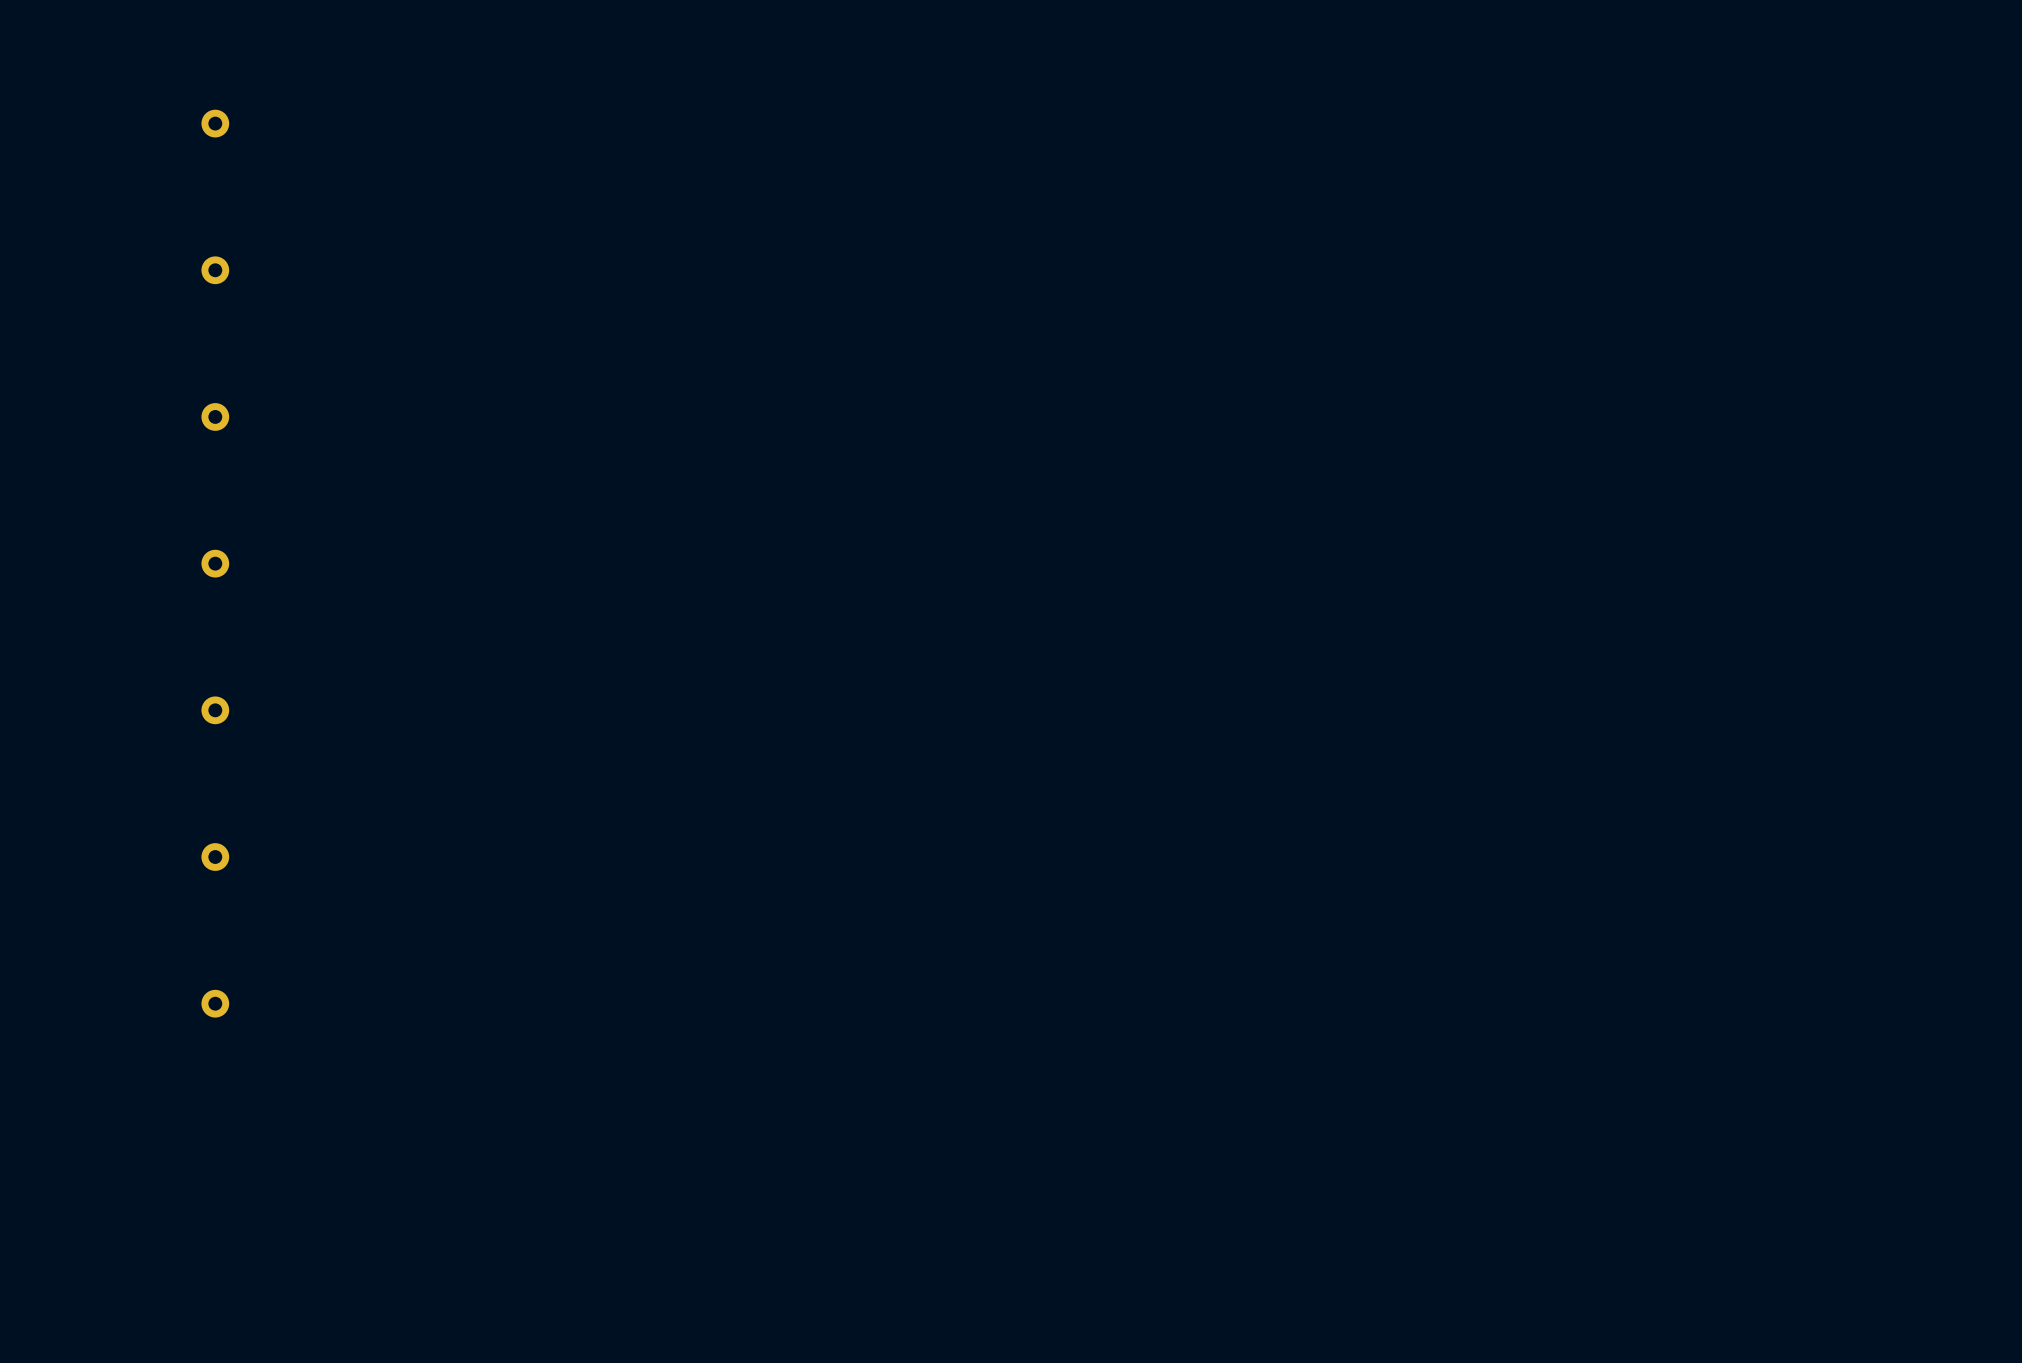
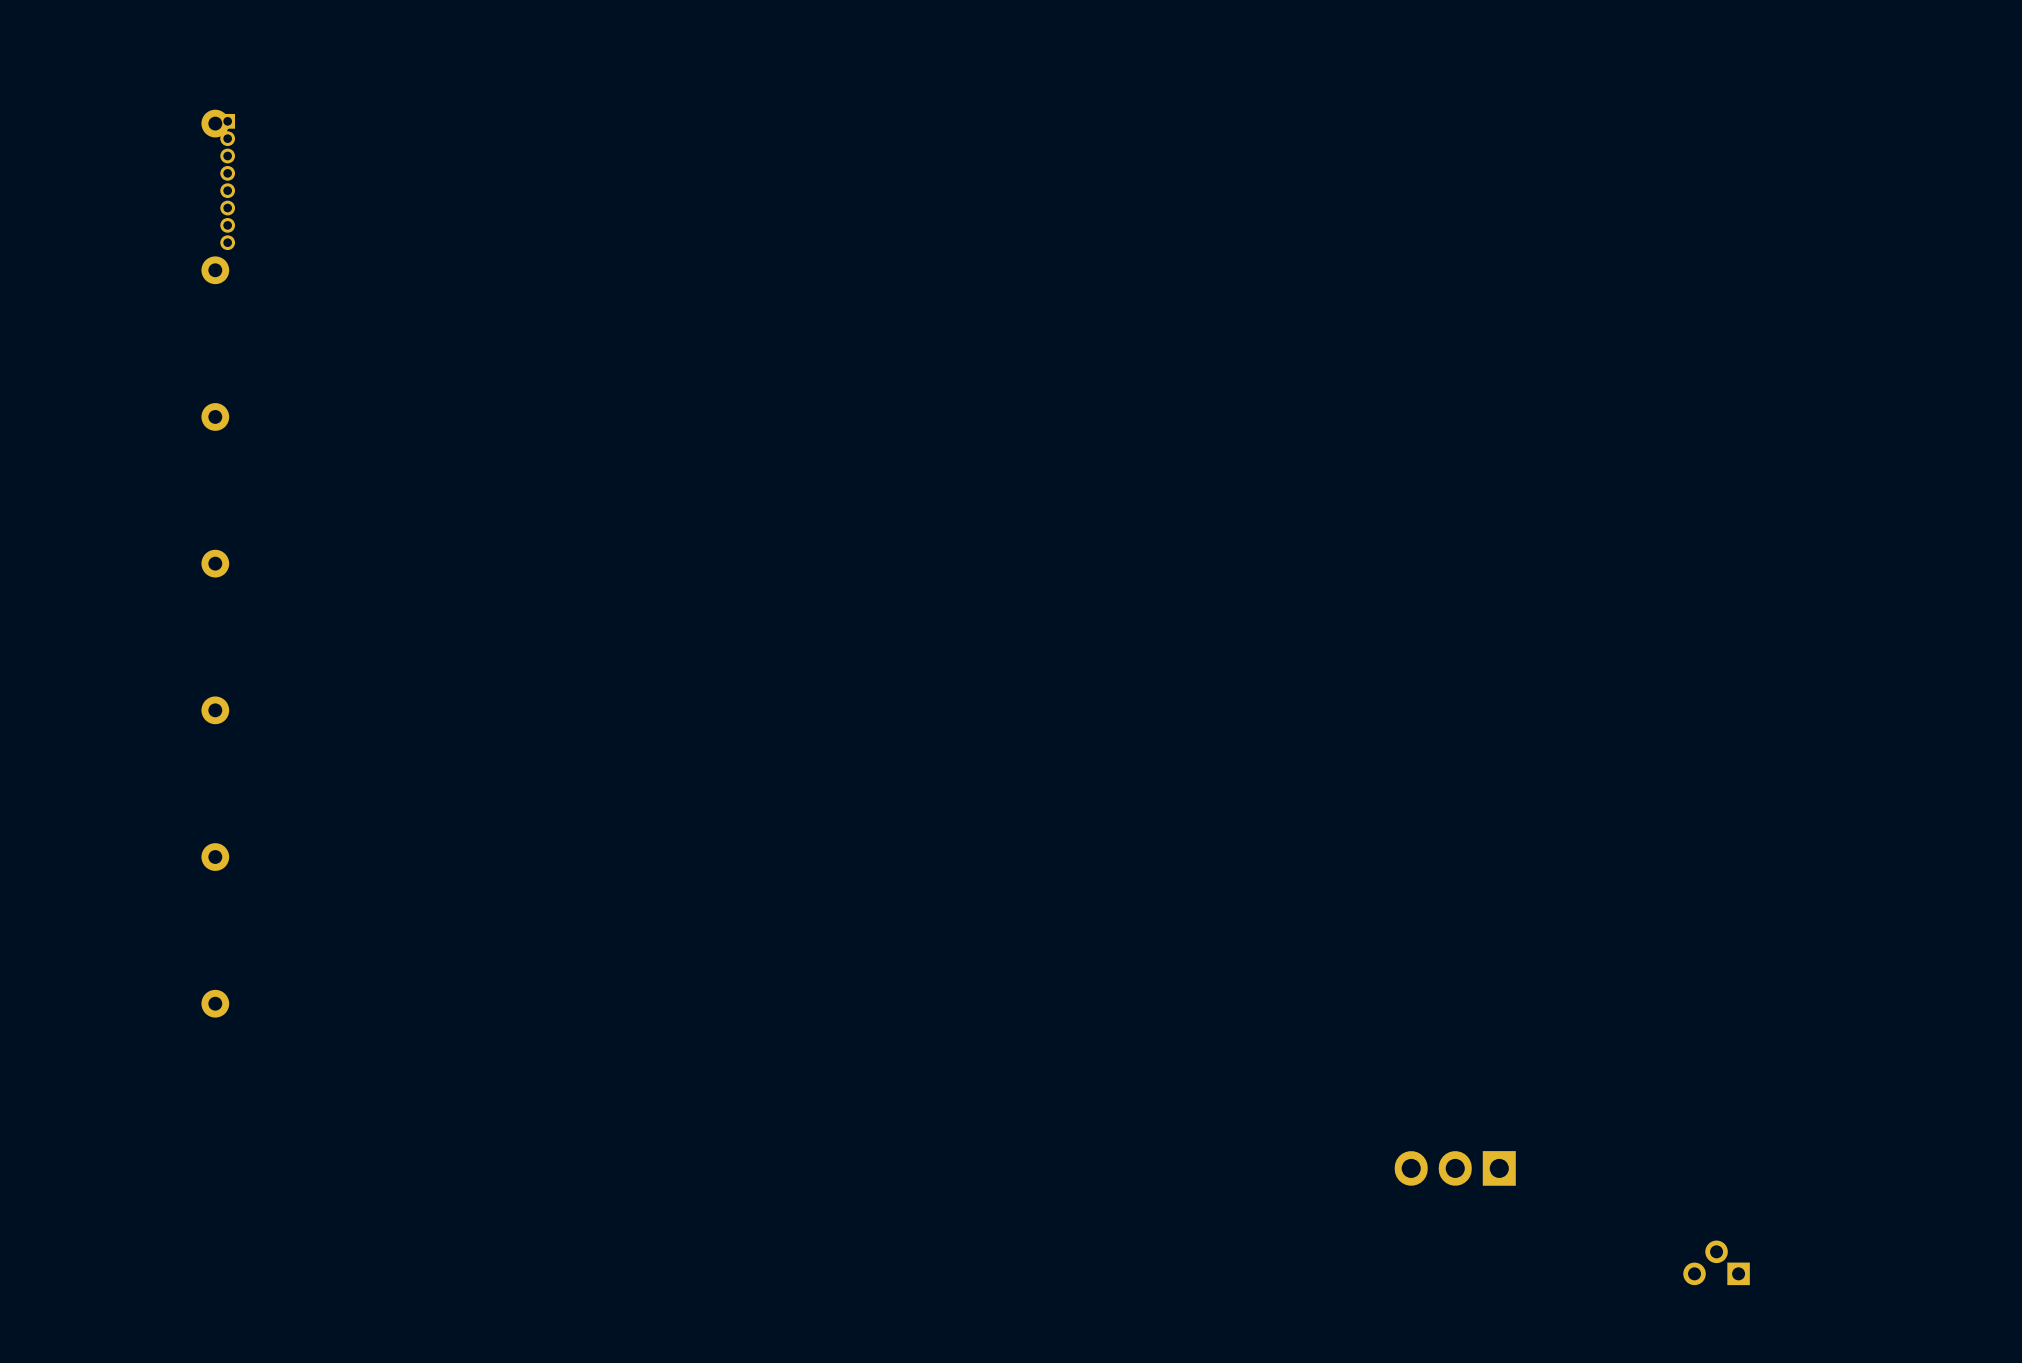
part: none -> (227, 182)
part: none -> (1455, 1168)
part: none -> (1716, 1262)

